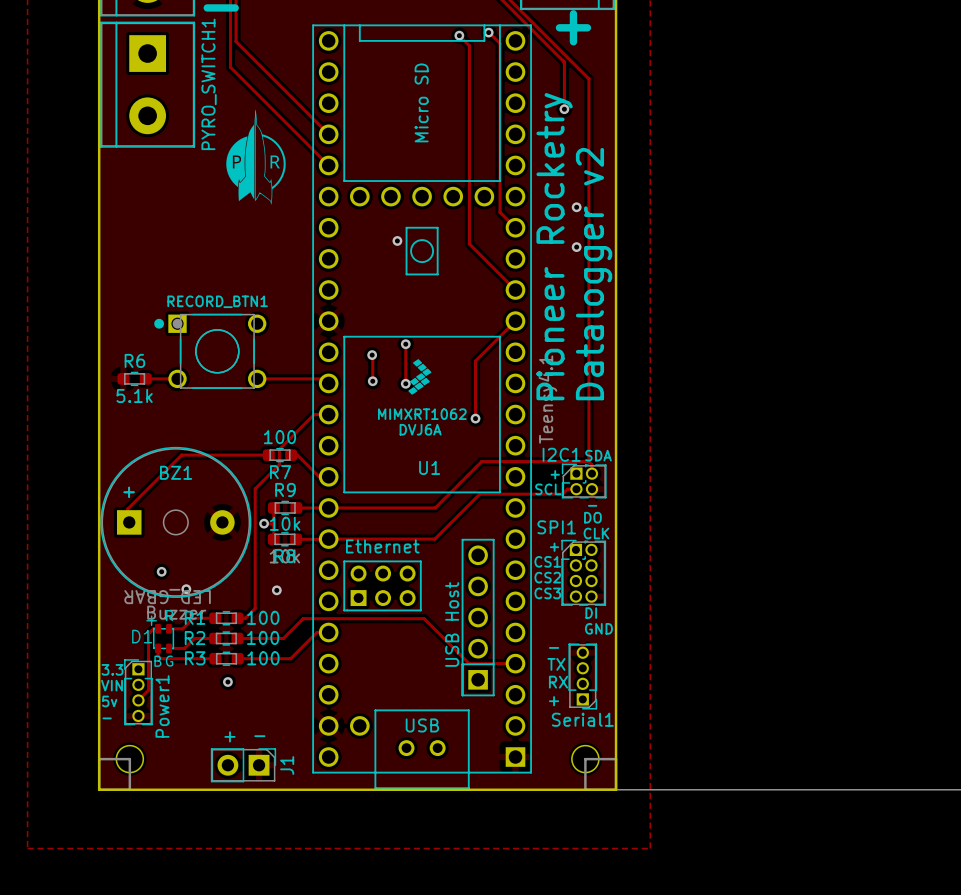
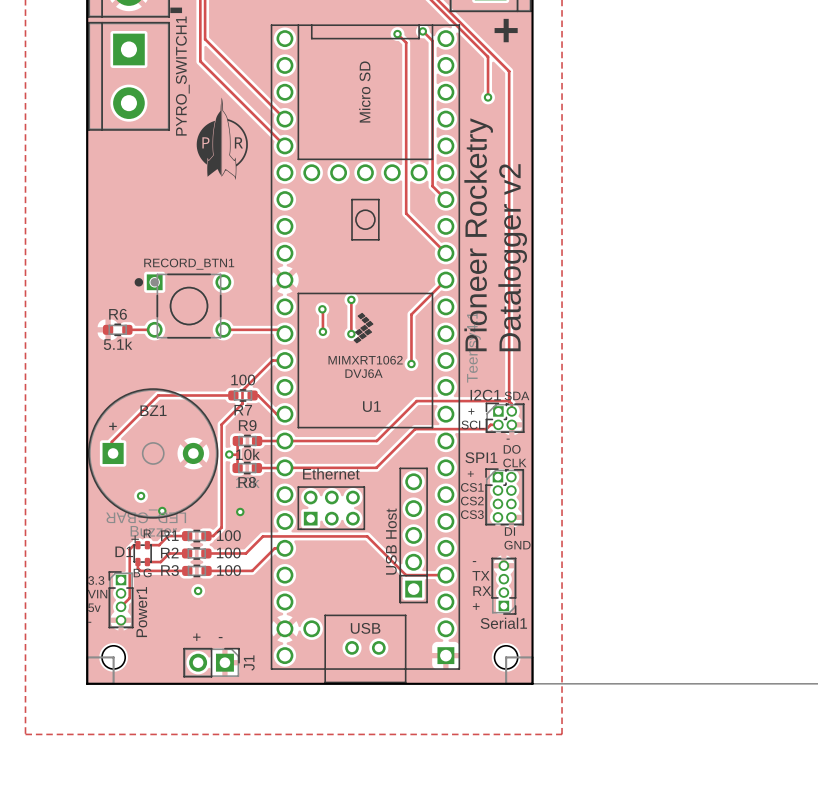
via: (576, 207) -> none
via: (397, 240) -> none
via: (576, 247) -> none

